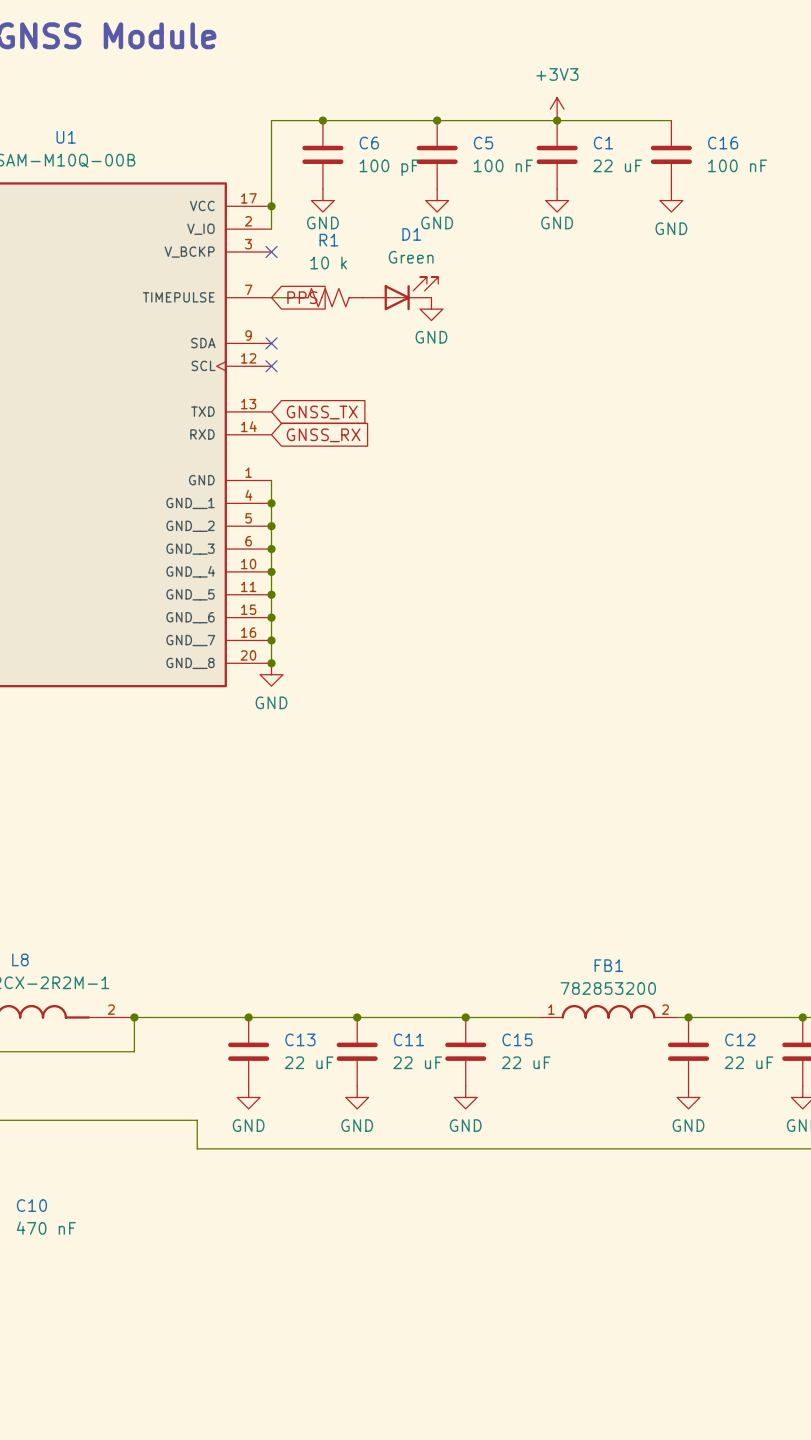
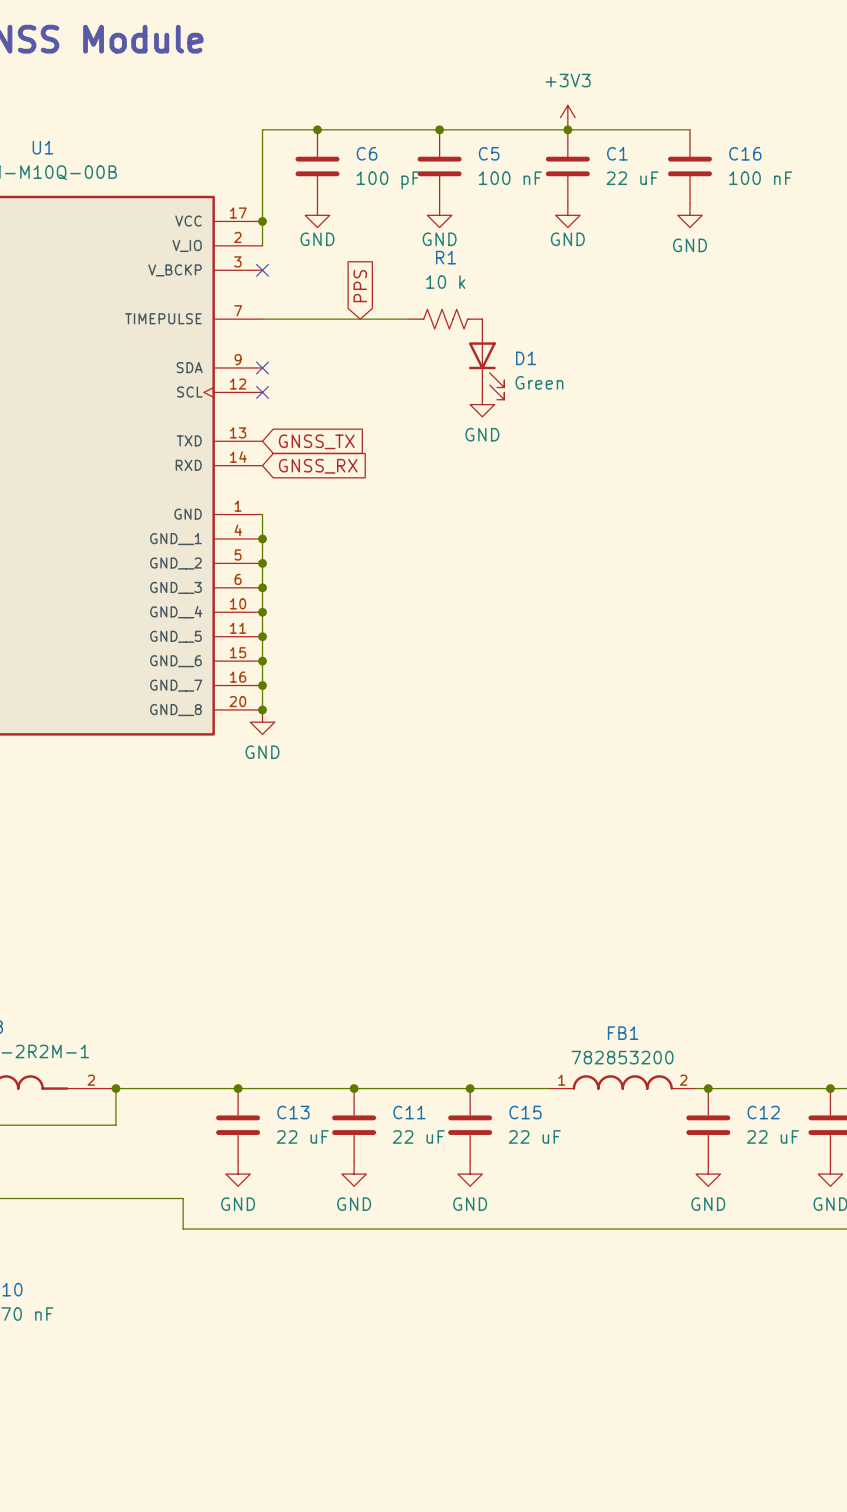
D1 name position: D1 (411, 234) -> D1 (526, 358)
D1 value position: Green (411, 257) -> Green (539, 382)
D1 position: (400, 293) -> (486, 359)
D1 rotation: 0° (411, 293) -> 90° clockwise (486, 371)
global label rotation: 0° (302, 297) -> 90° counterclockwise (360, 286)
global label position: PPS (302, 297) -> PPS (360, 286)
R1 position: (328, 297) -> (445, 319)
power symbol position: GND (431, 309) -> GND (482, 404)

